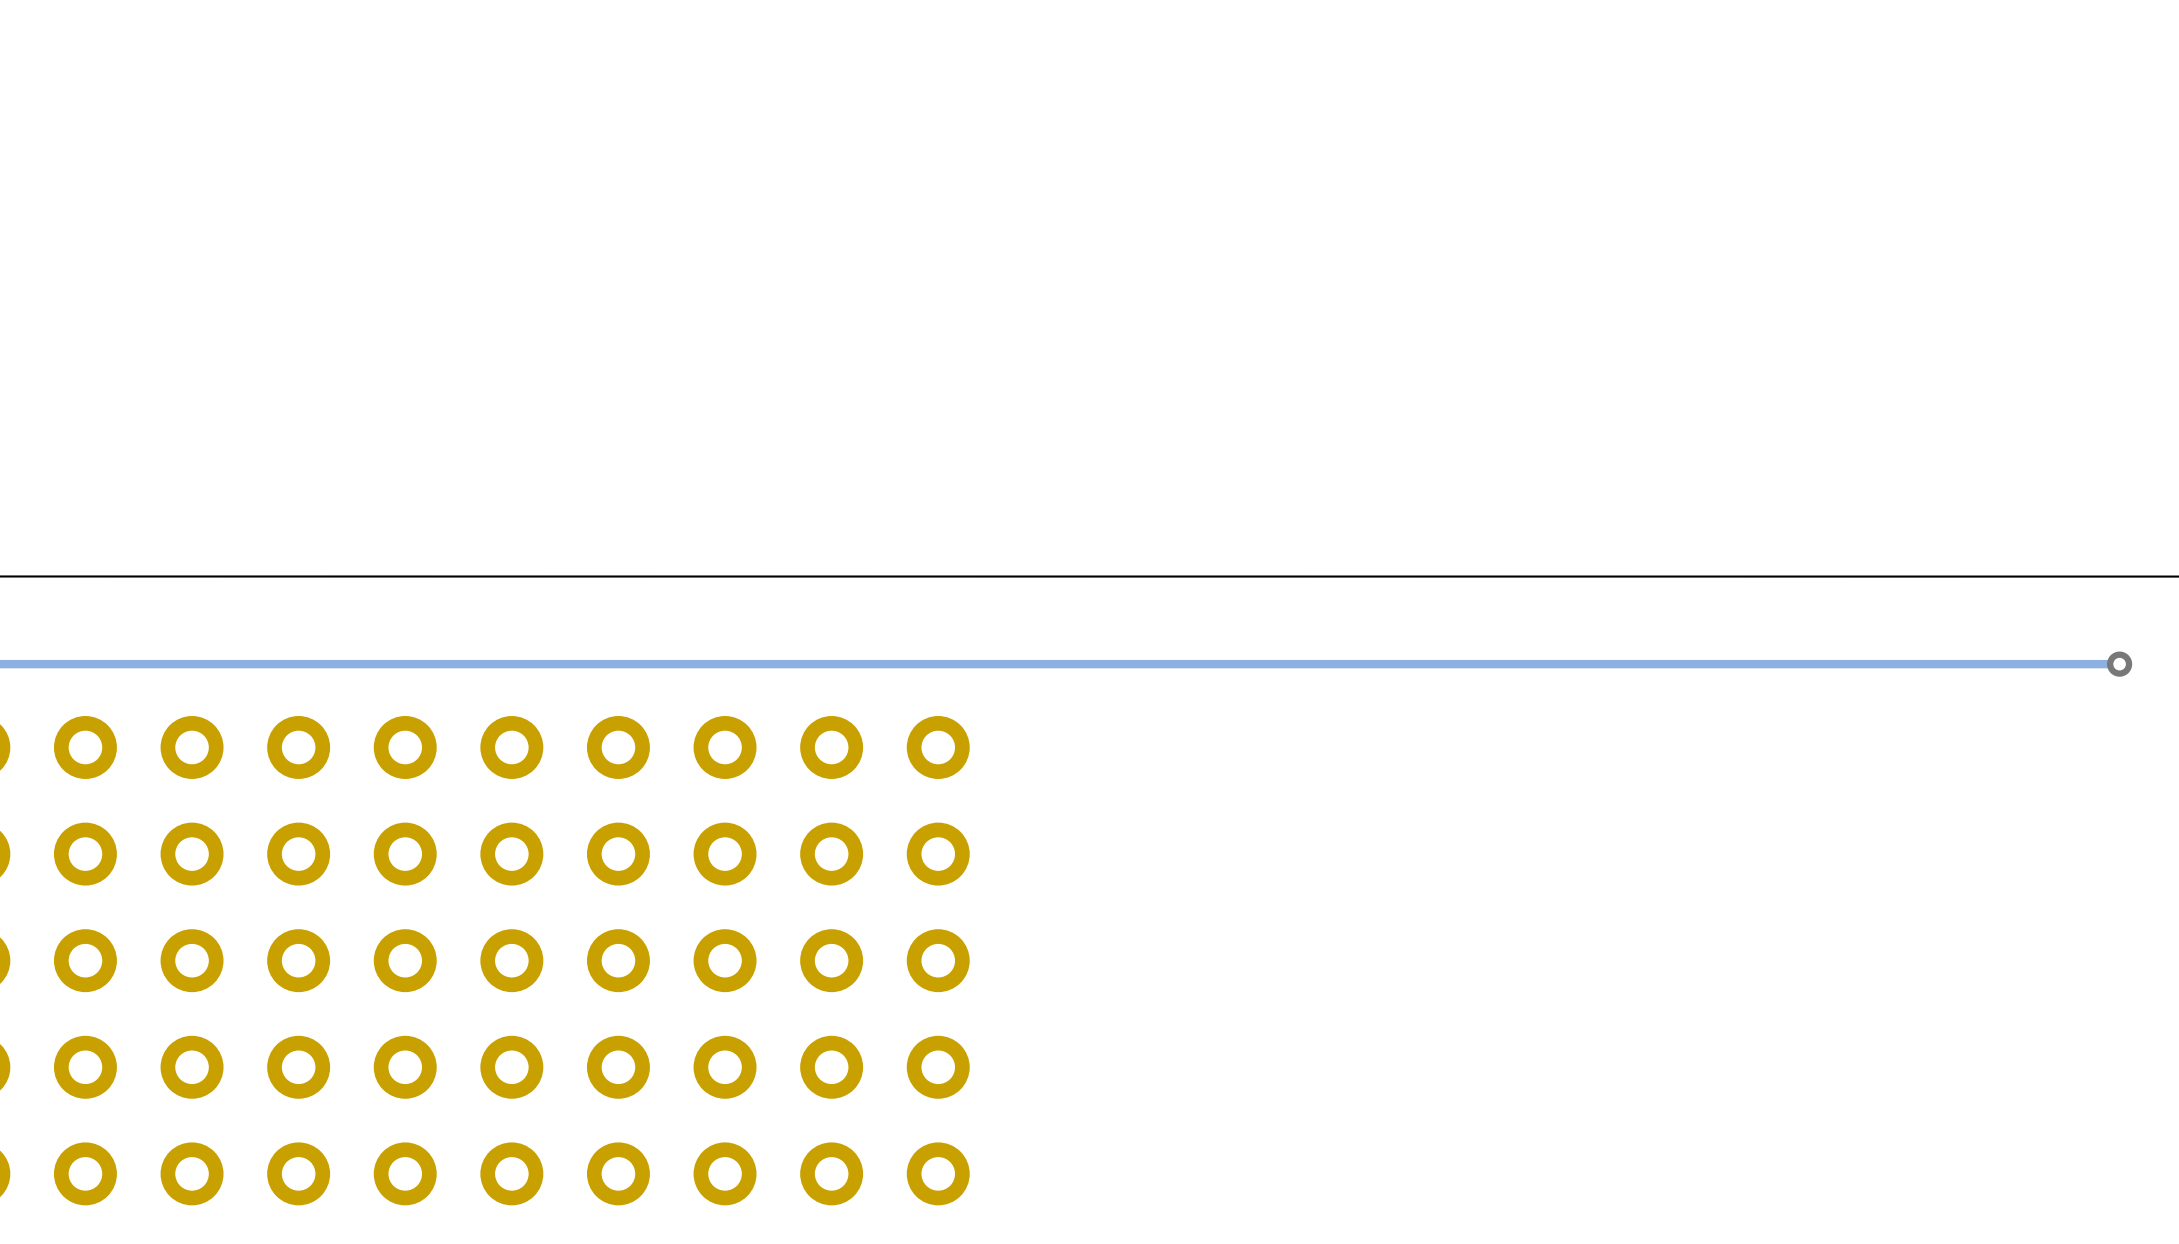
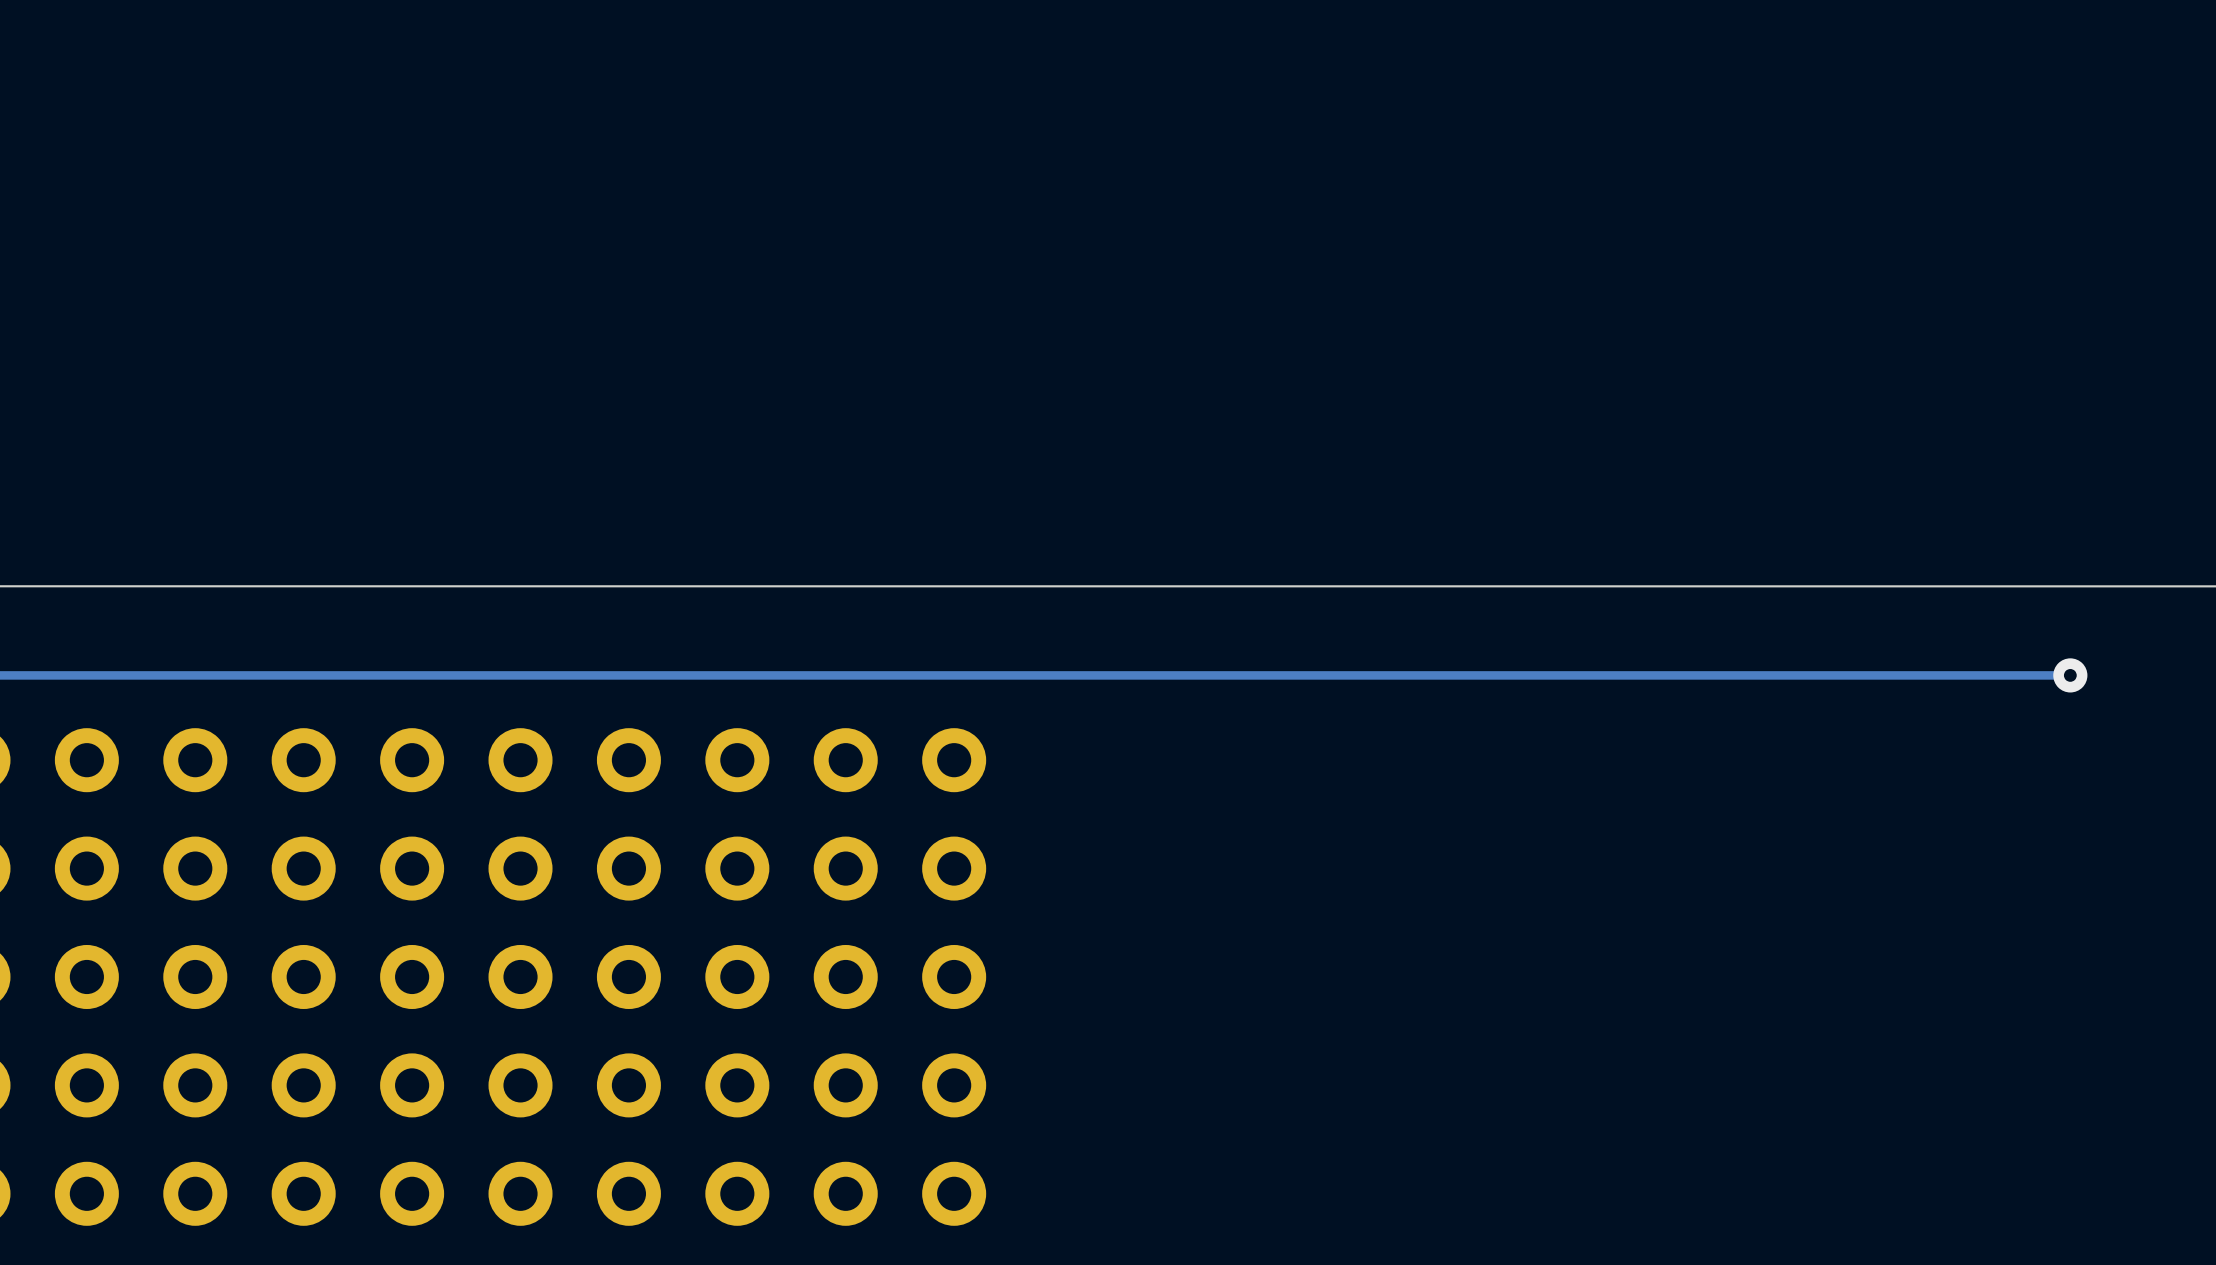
via: none -> (2070, 675)
track: (2119, 664) (2035, 664) -> none
via: (2119, 664) -> none

